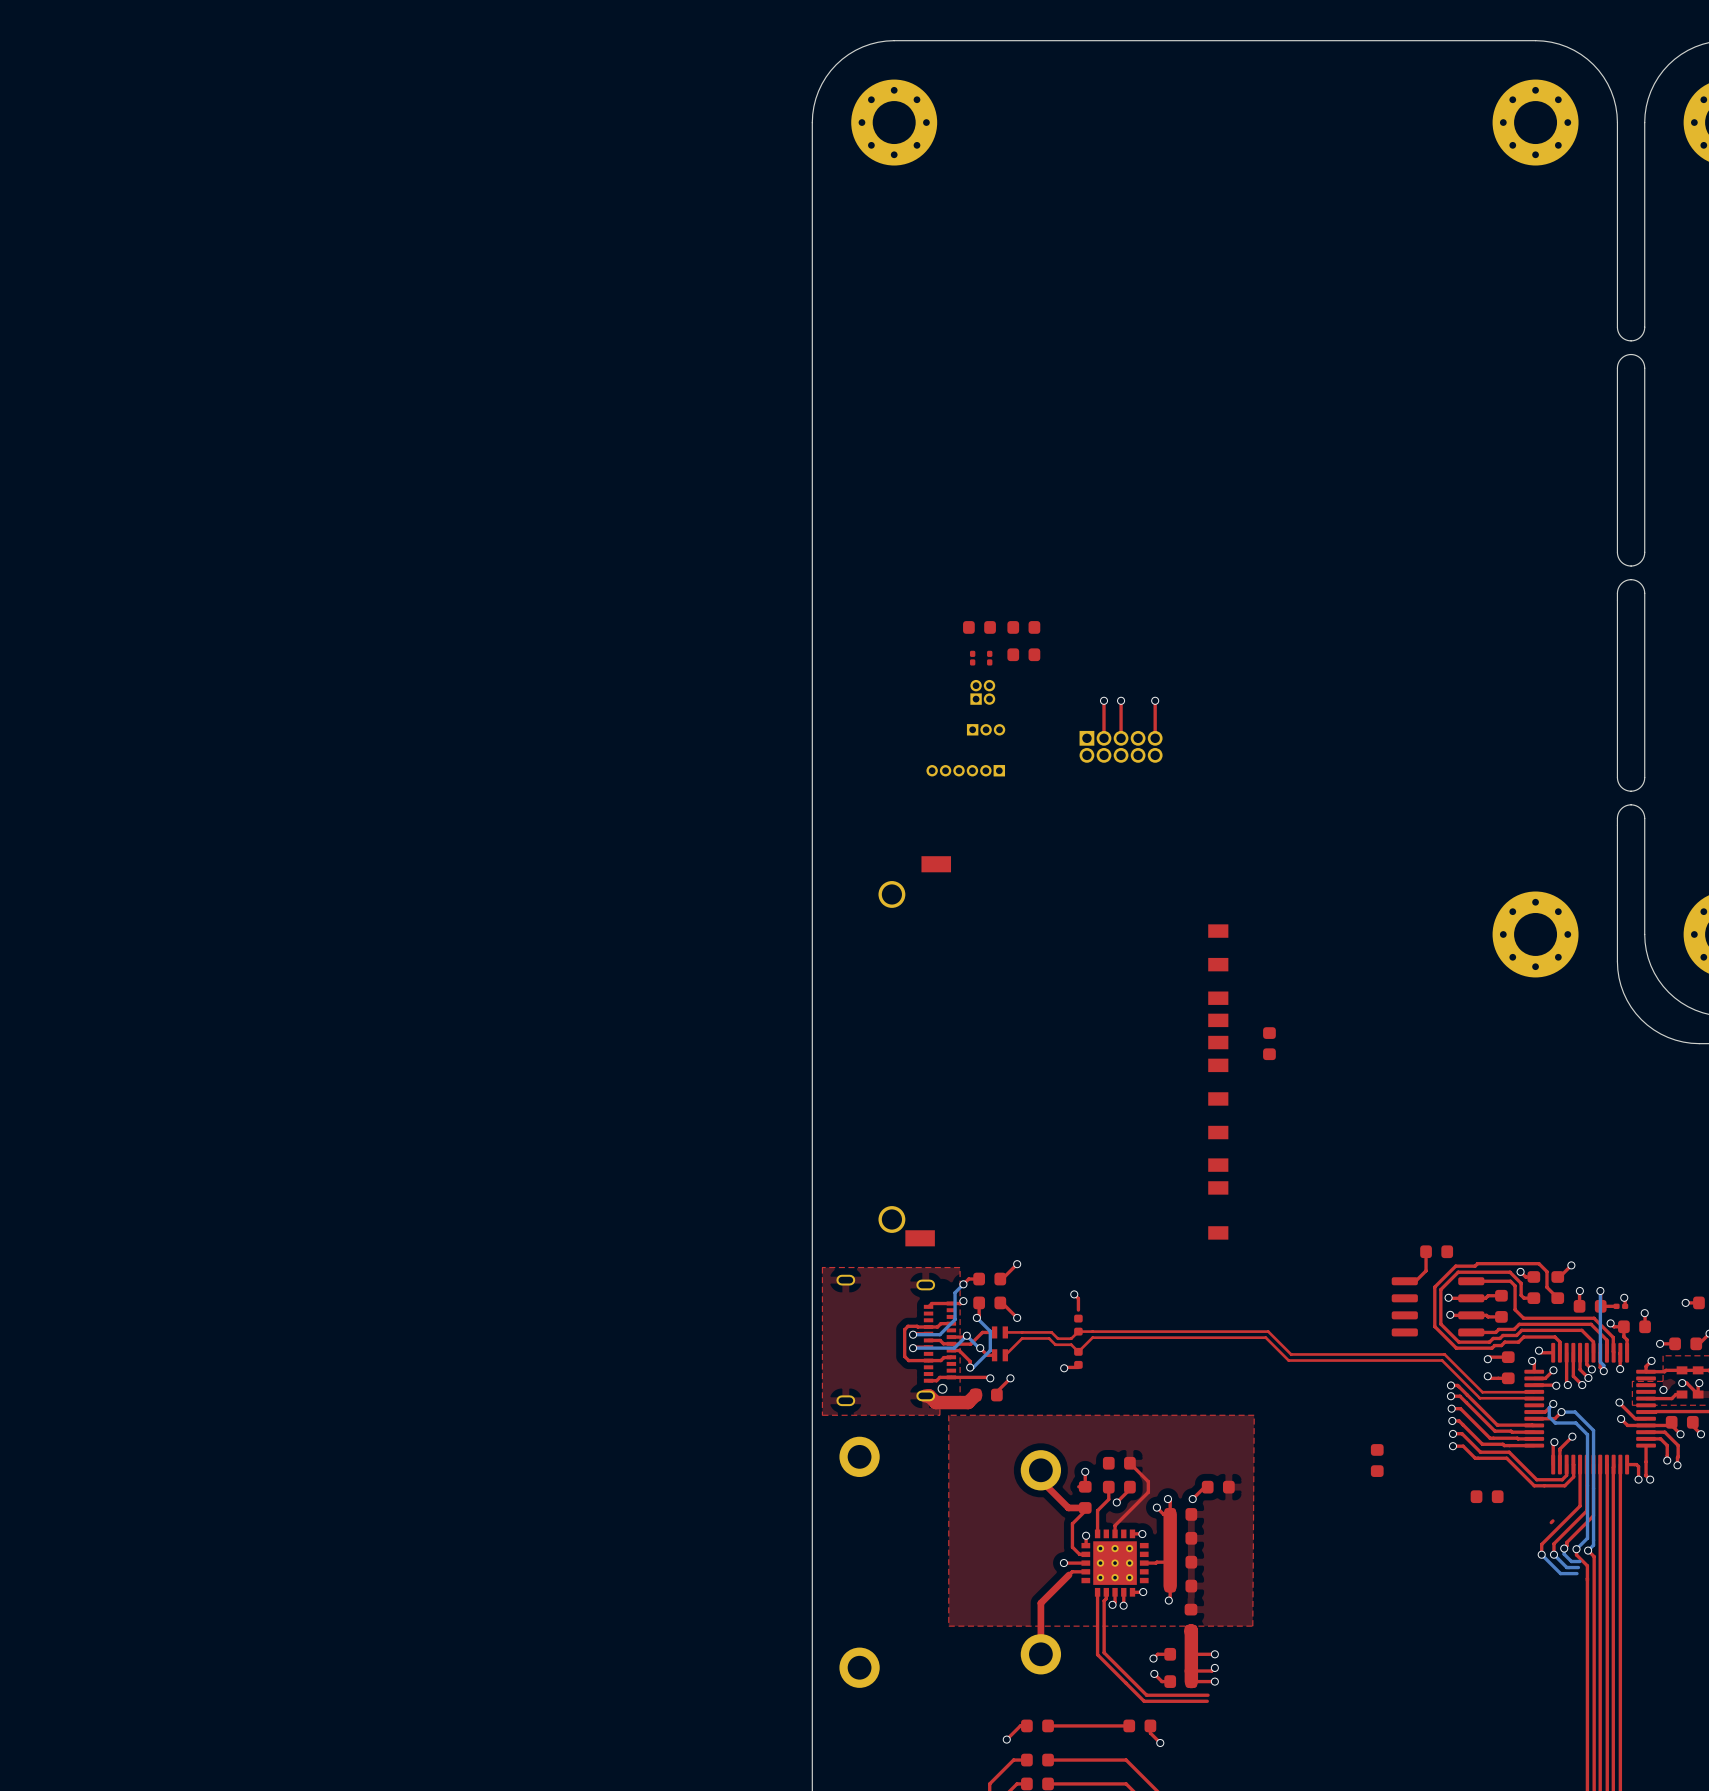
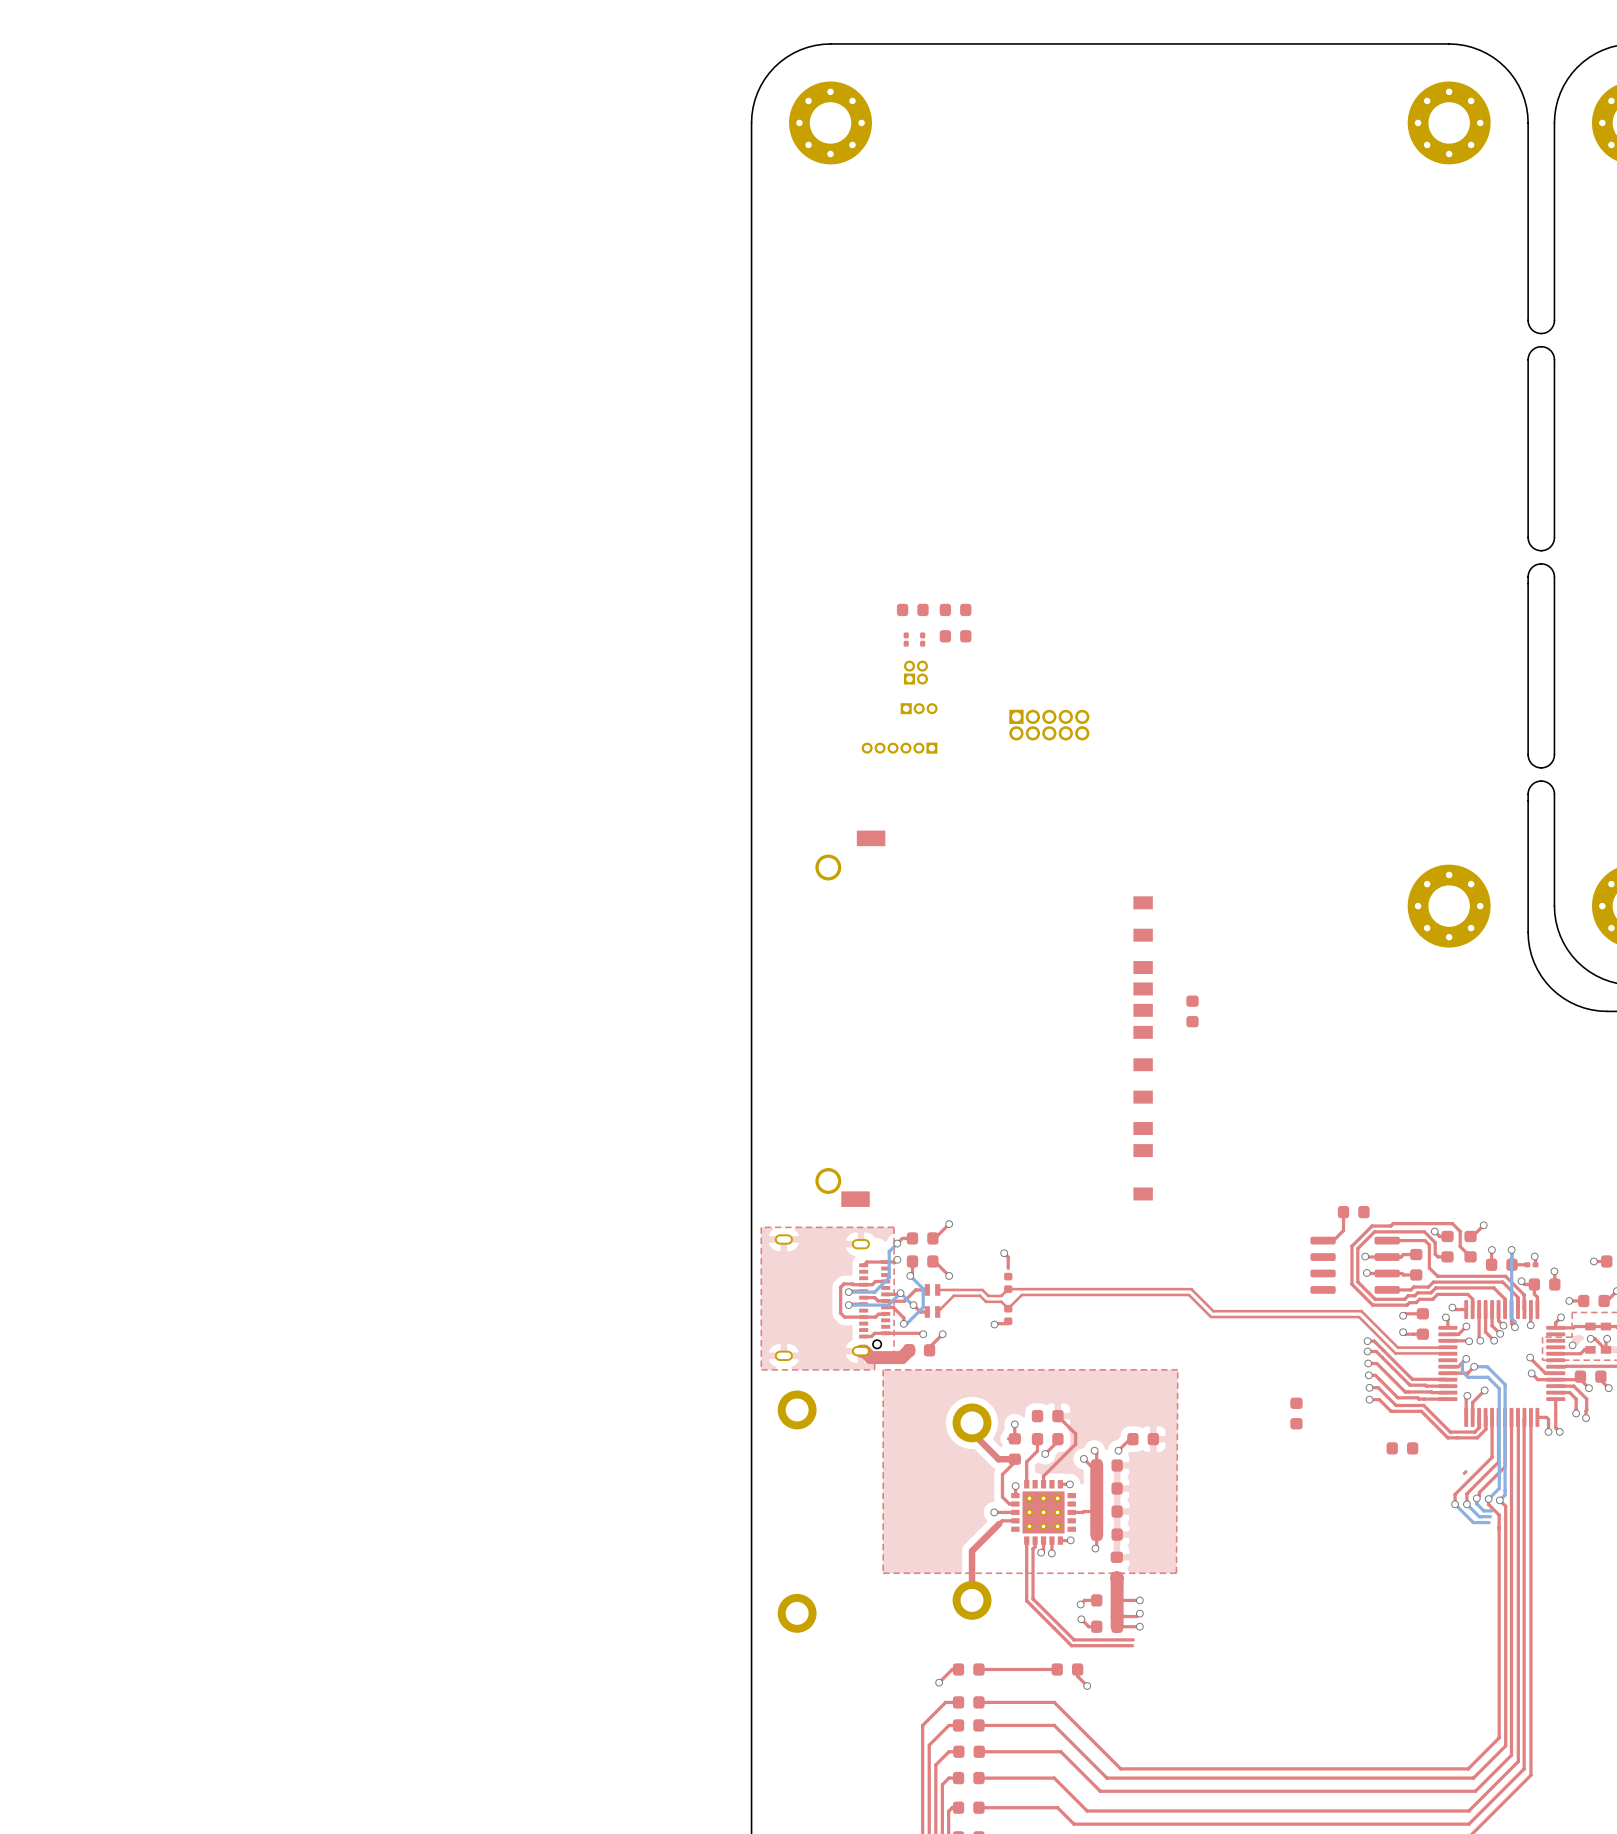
top track: (1104, 700) (1104, 738) -> none
via: (1104, 700) -> none
top track: (1121, 700) (1121, 738) -> none
via: (1121, 700) -> none
top track: (1155, 700) (1155, 738) -> none
via: (1155, 700) -> none

